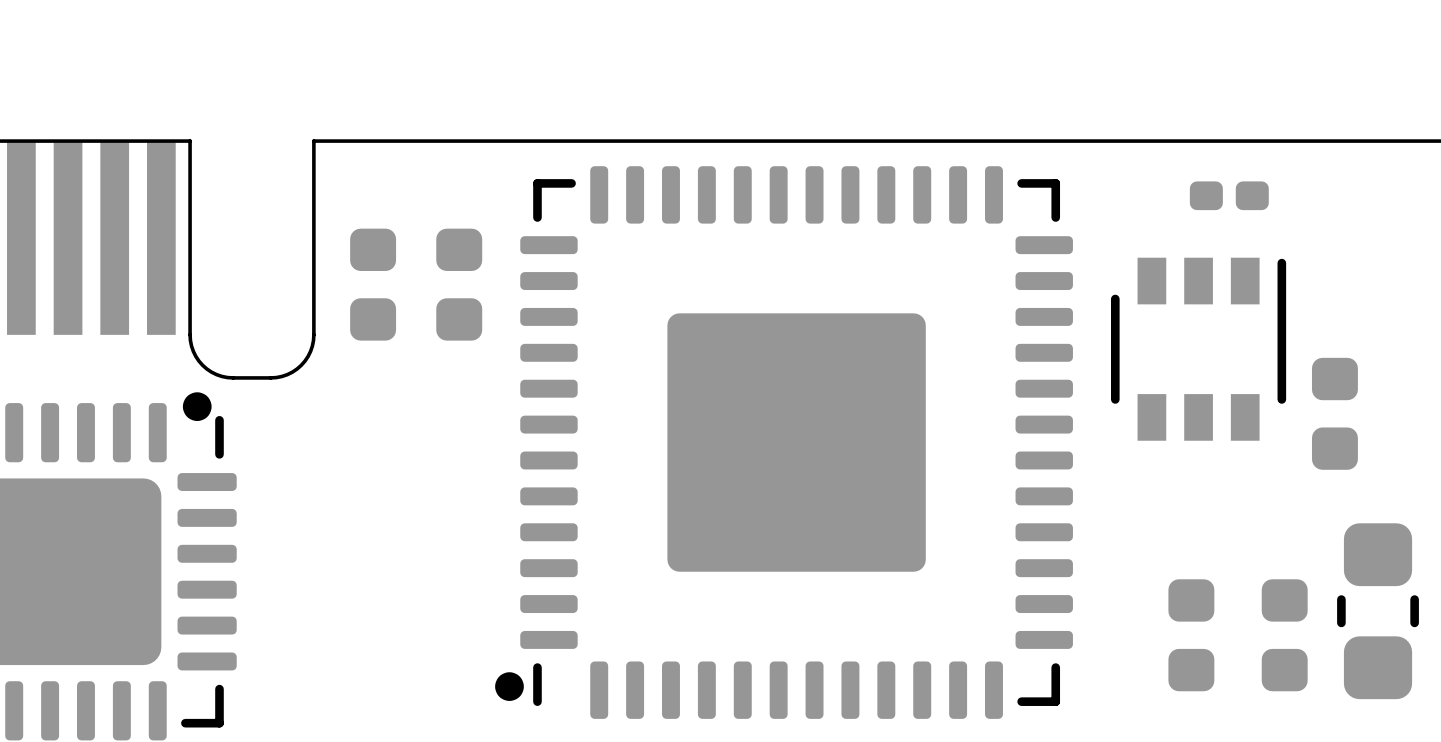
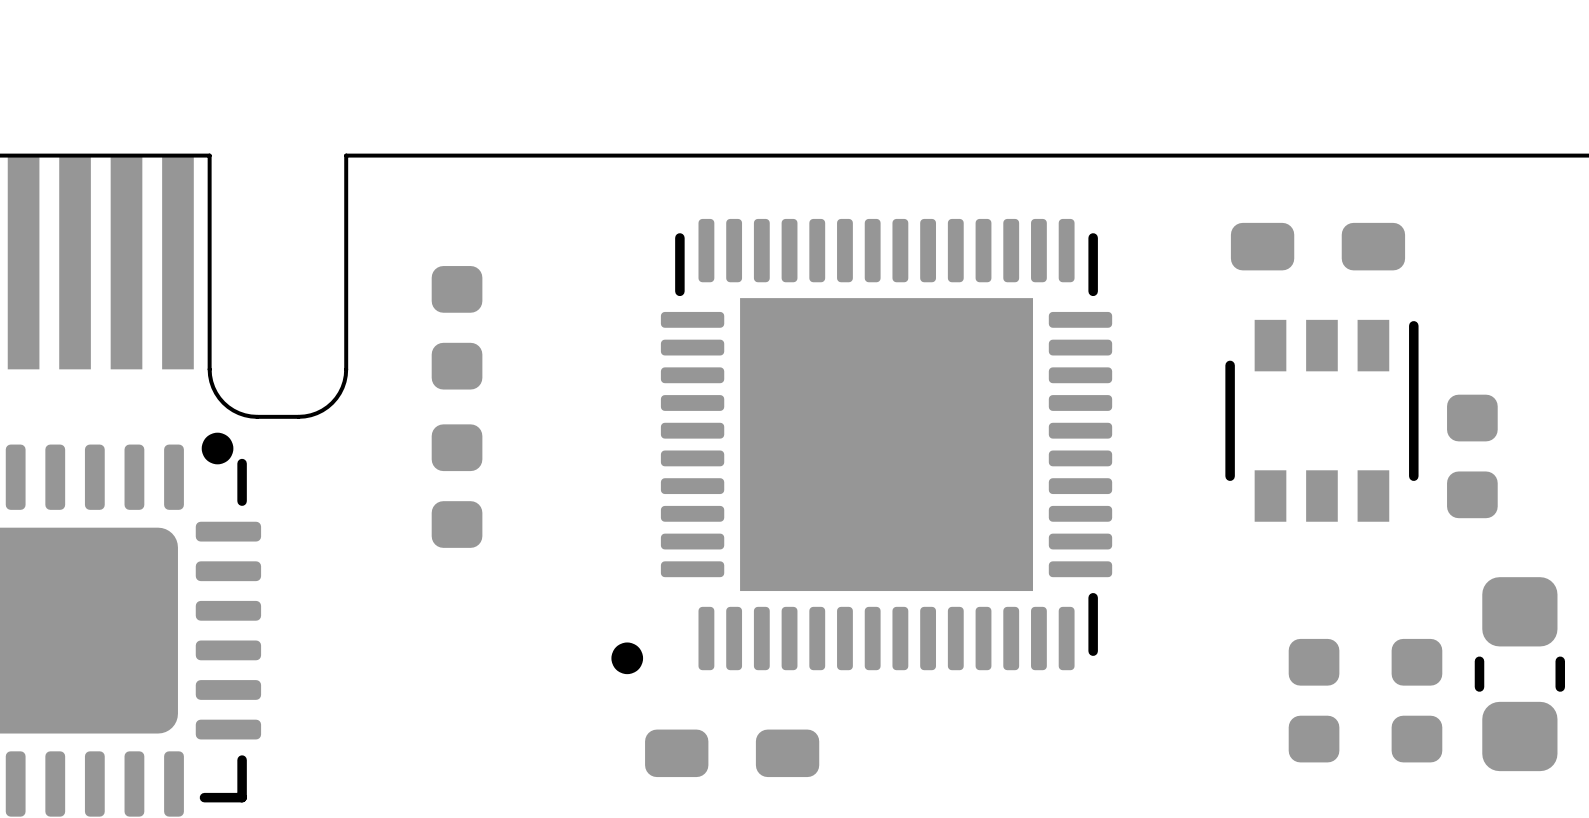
part footprint: [520, 166, 1073, 719] -> [660, 218, 1113, 671]
part footprint: [1189, 181, 1269, 211] -> [1230, 222, 1406, 271]
part: (373, 284) -> none
part: (459, 284) -> none
part: none -> (457, 327)
part position: (1198, 349) -> (1321, 420)
part: none -> (457, 486)
part: none -> (732, 753)
drawing position: (509, 686) -> (627, 658)

